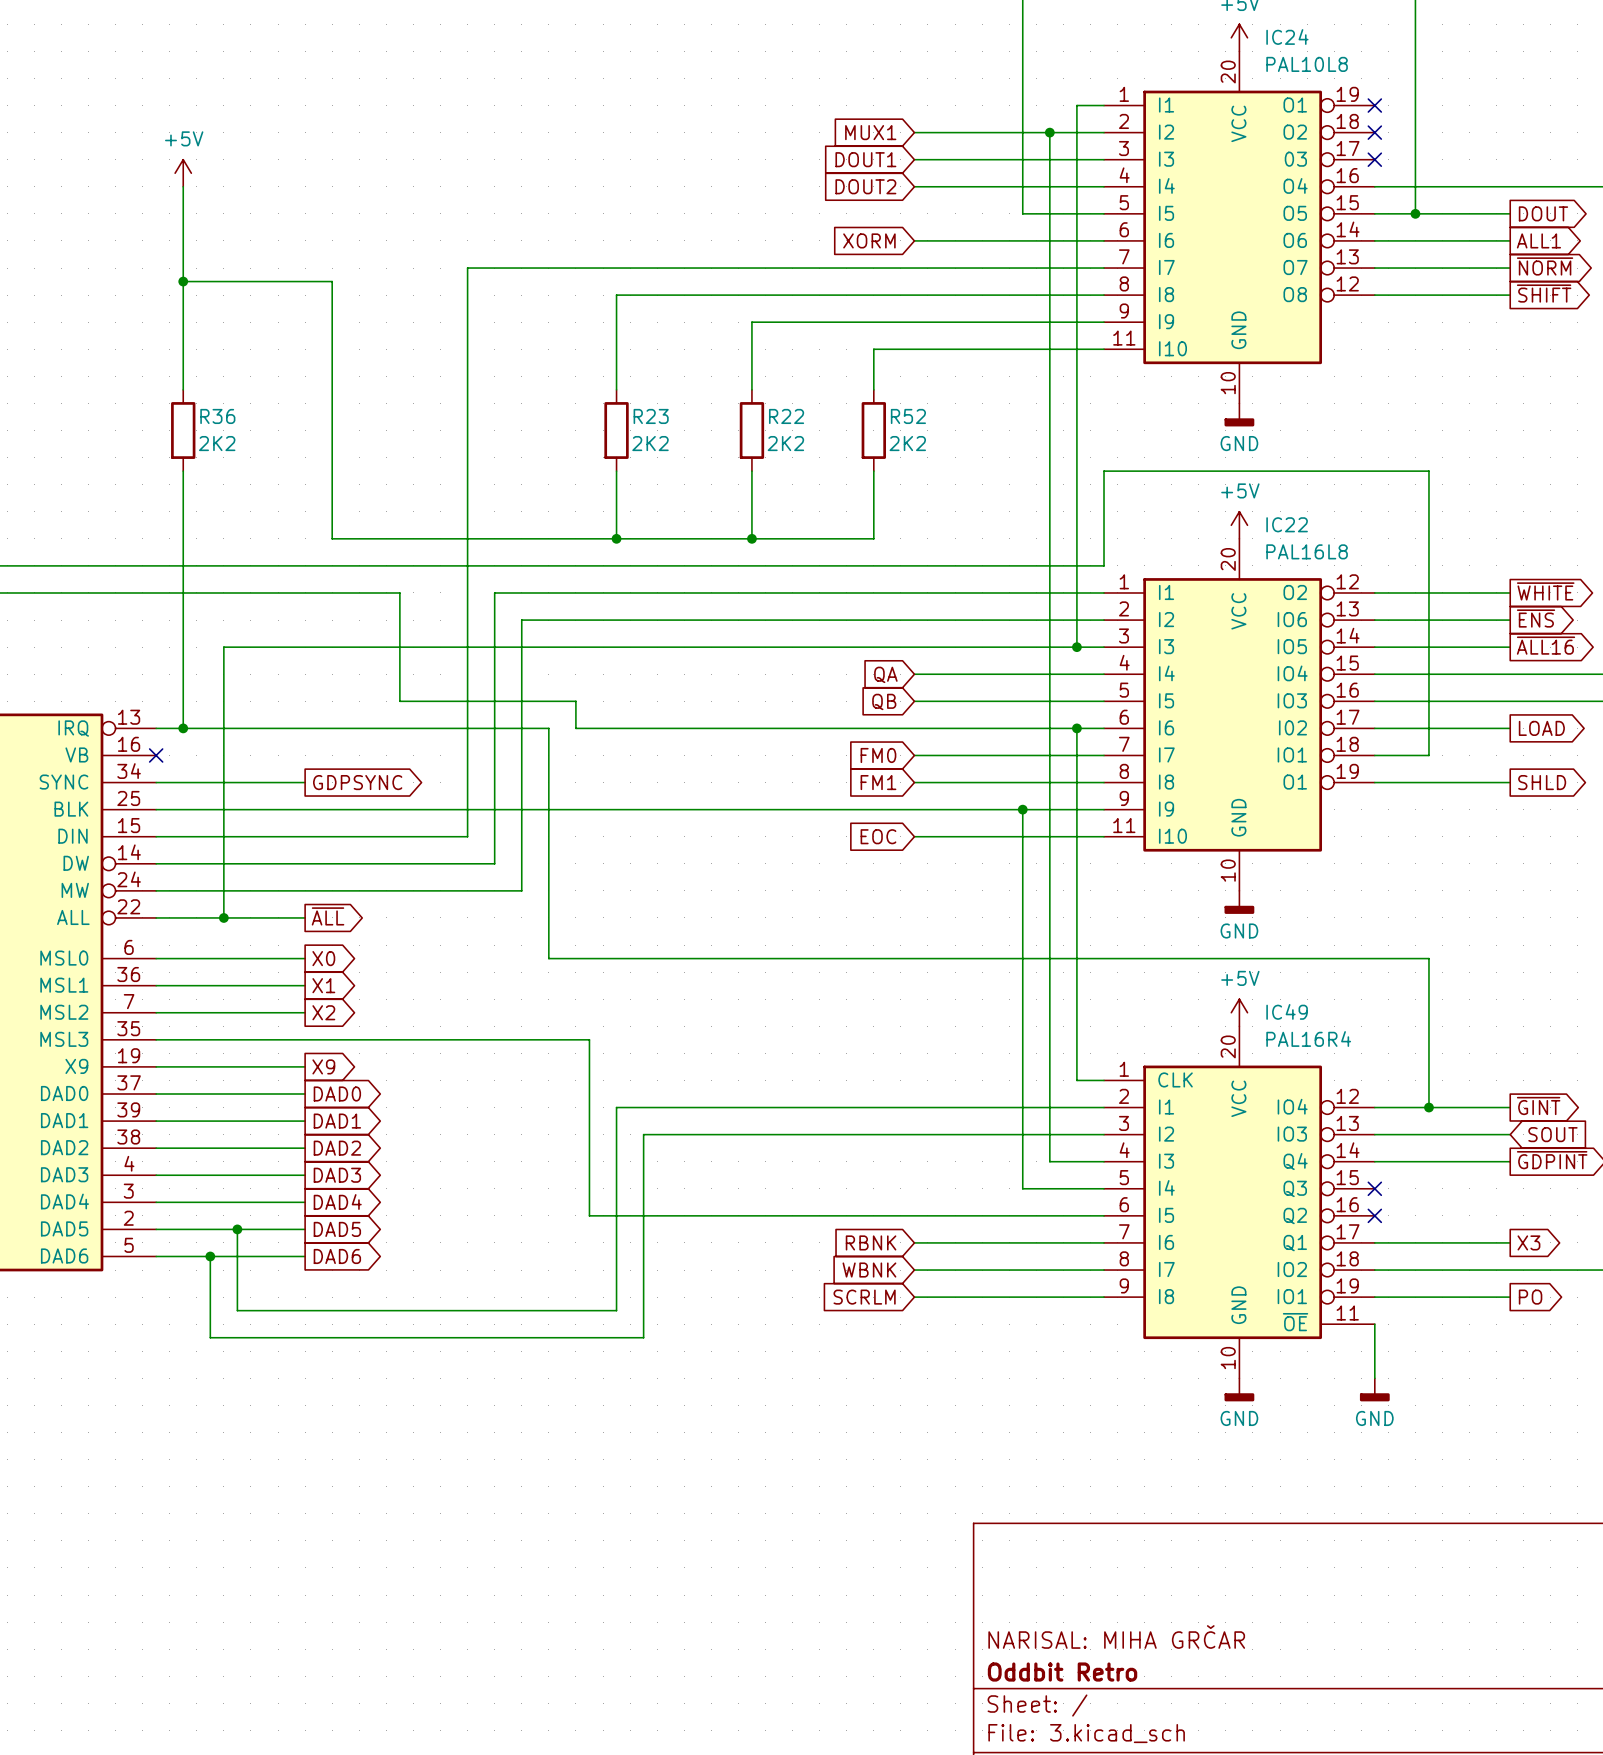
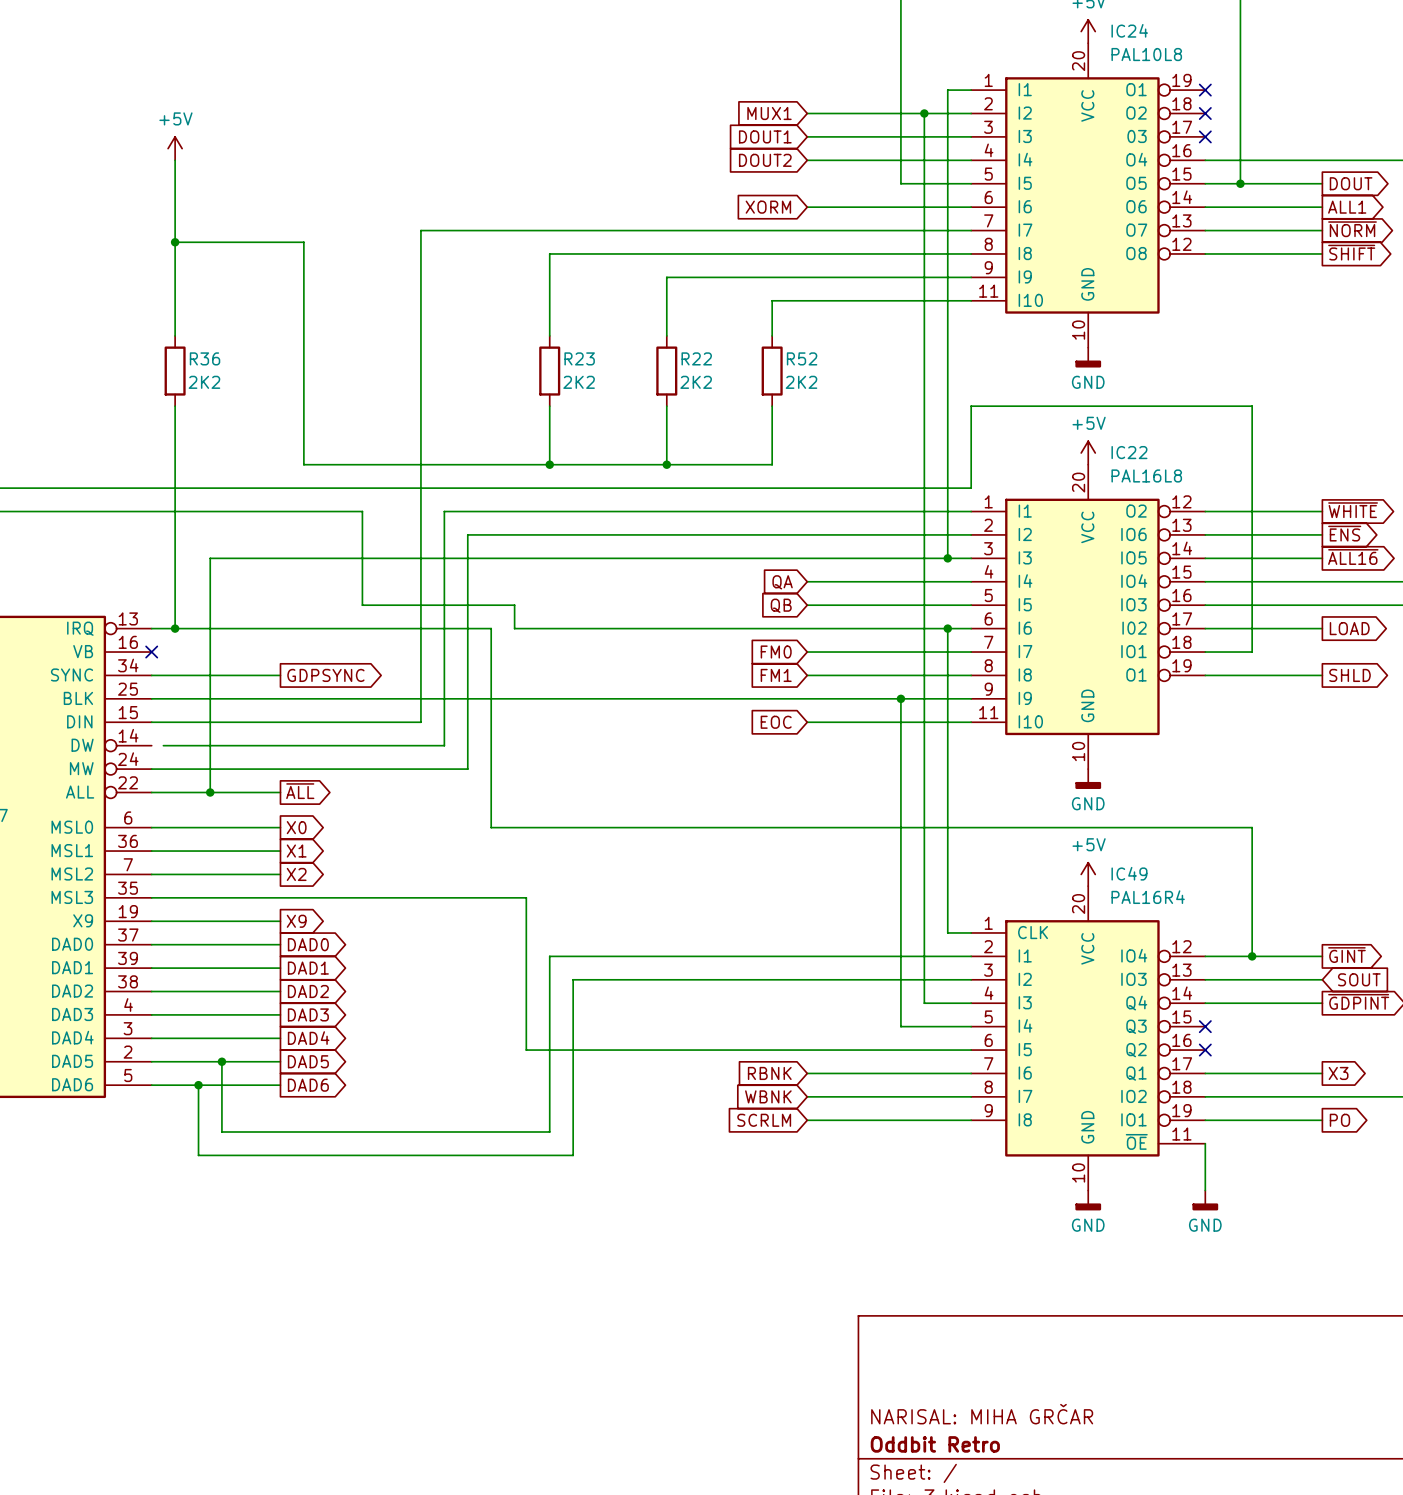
wire: (156, 863) (169, 863) -> none

